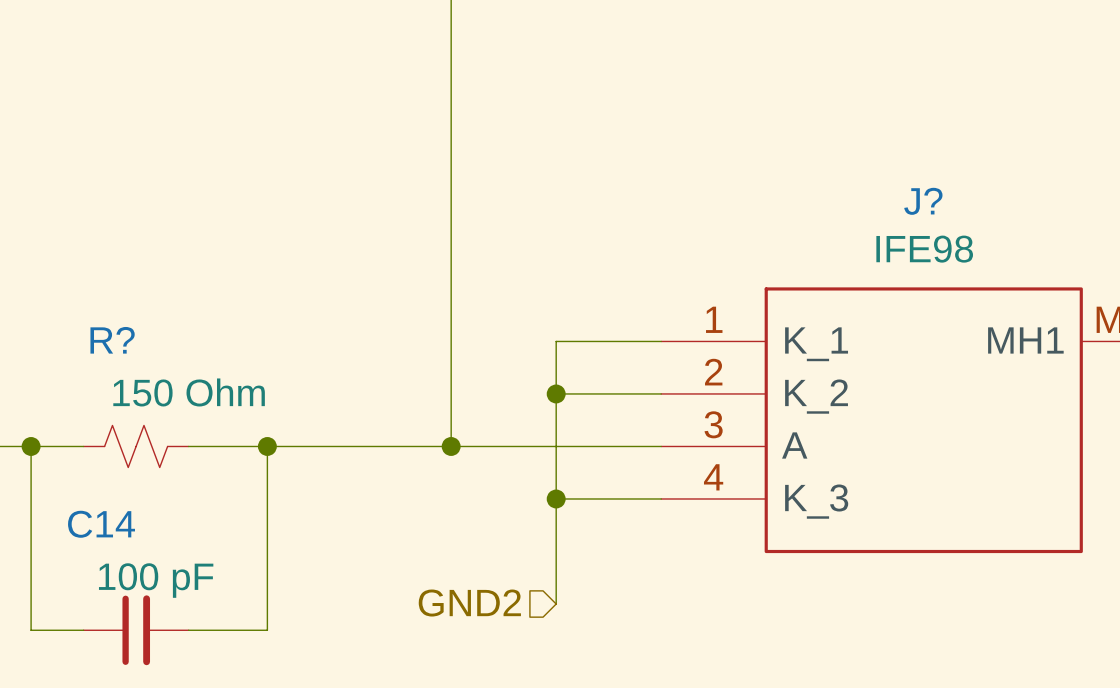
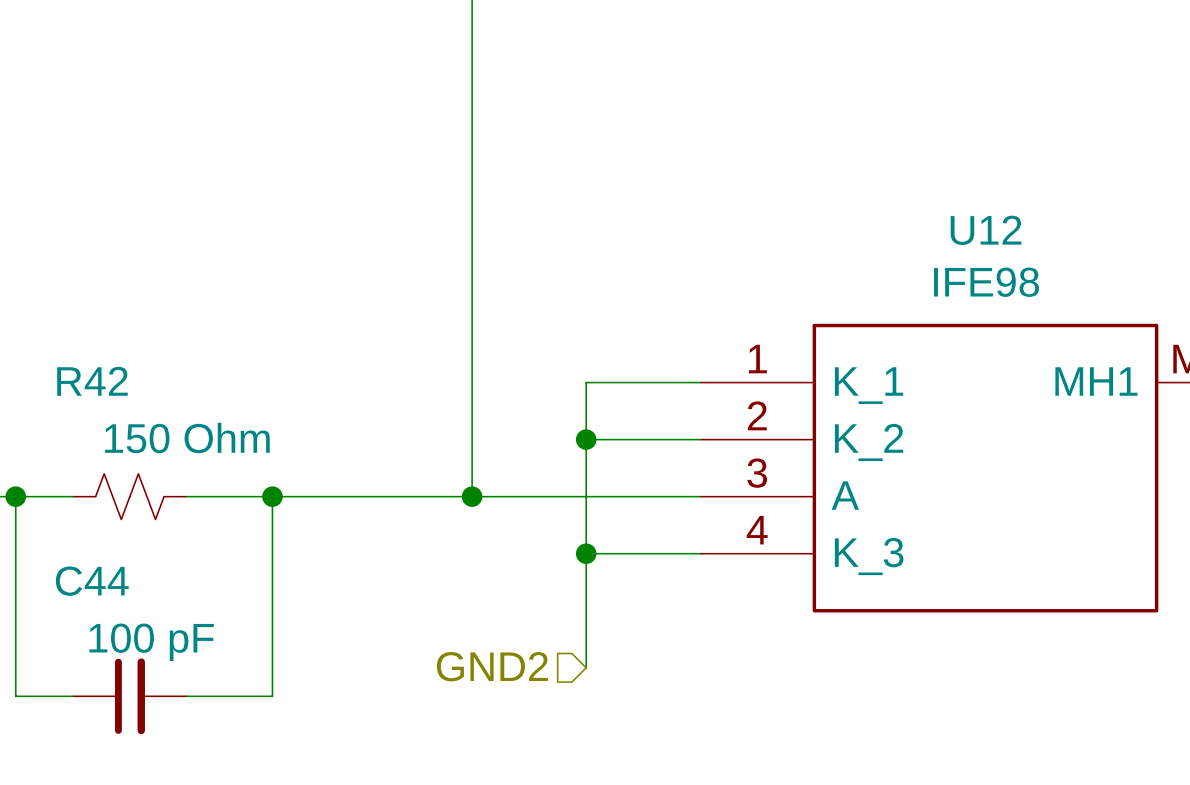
J? name: J? (923, 201) -> U12 (986, 230)
R? name: R? (112, 340) -> R42 (92, 381)
C14 name: C14 (101, 524) -> C44 (92, 581)

